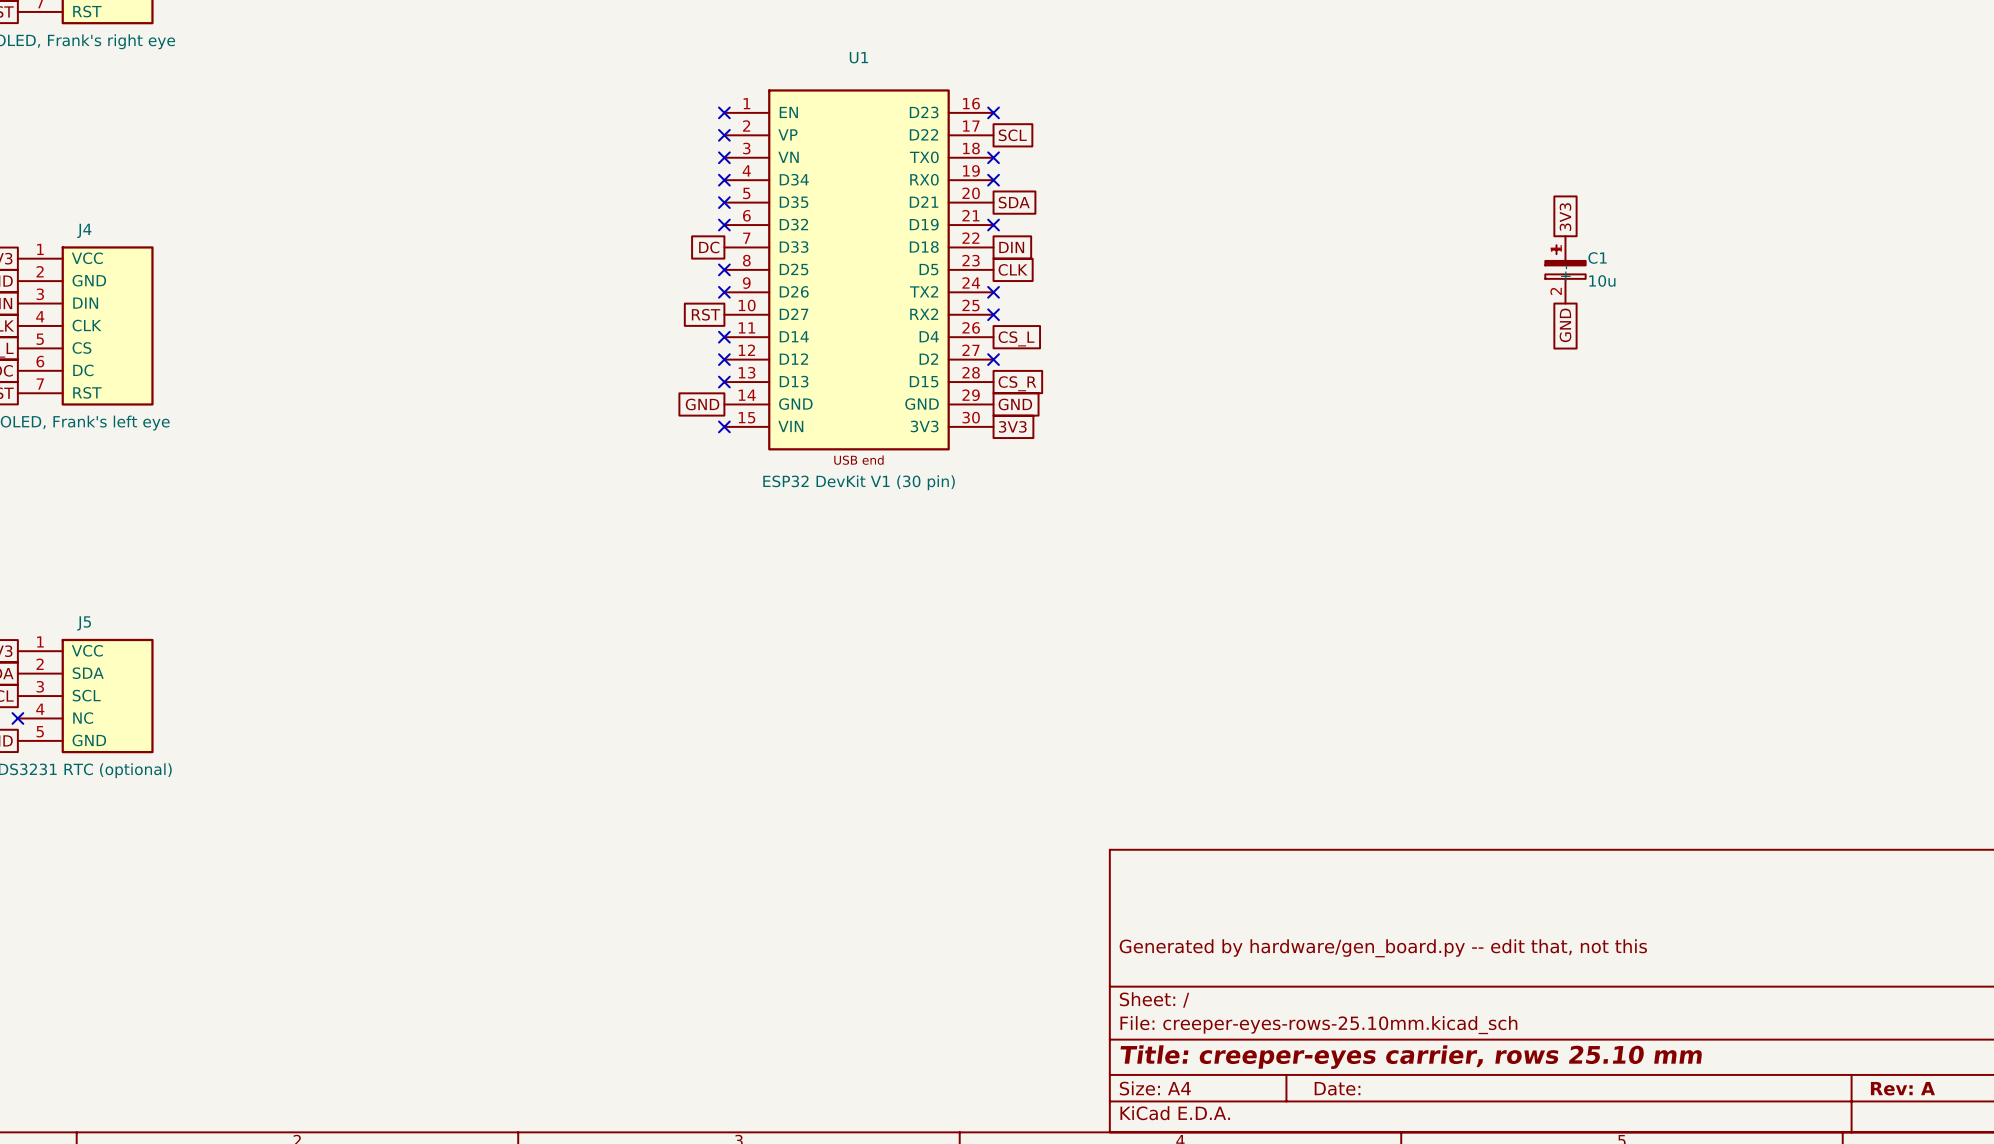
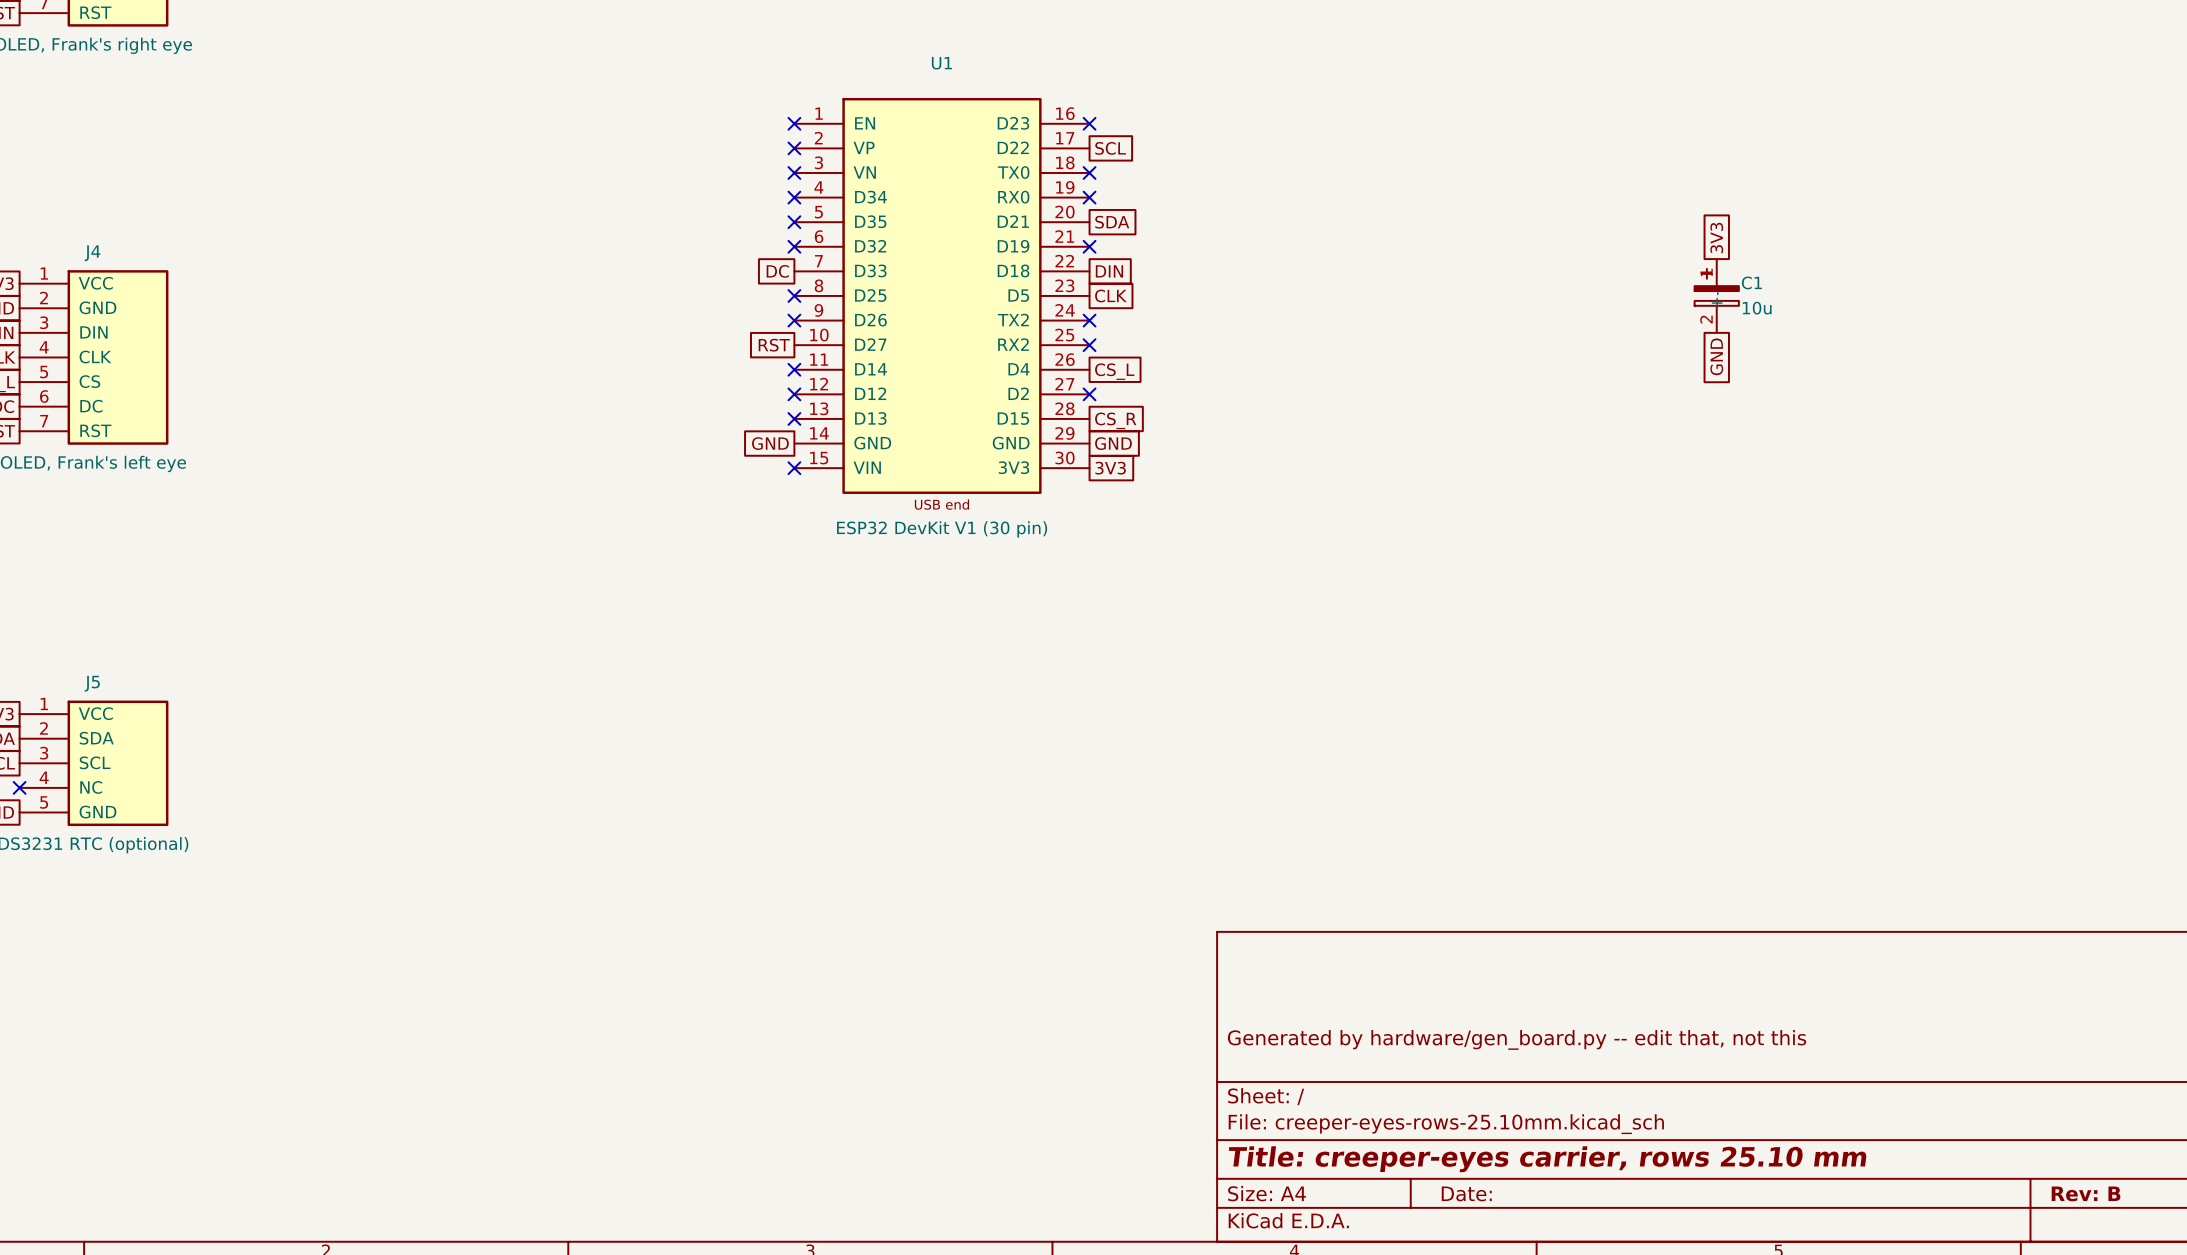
title block: Rev: A (1902, 1088) -> Rev: B (2086, 1193)

